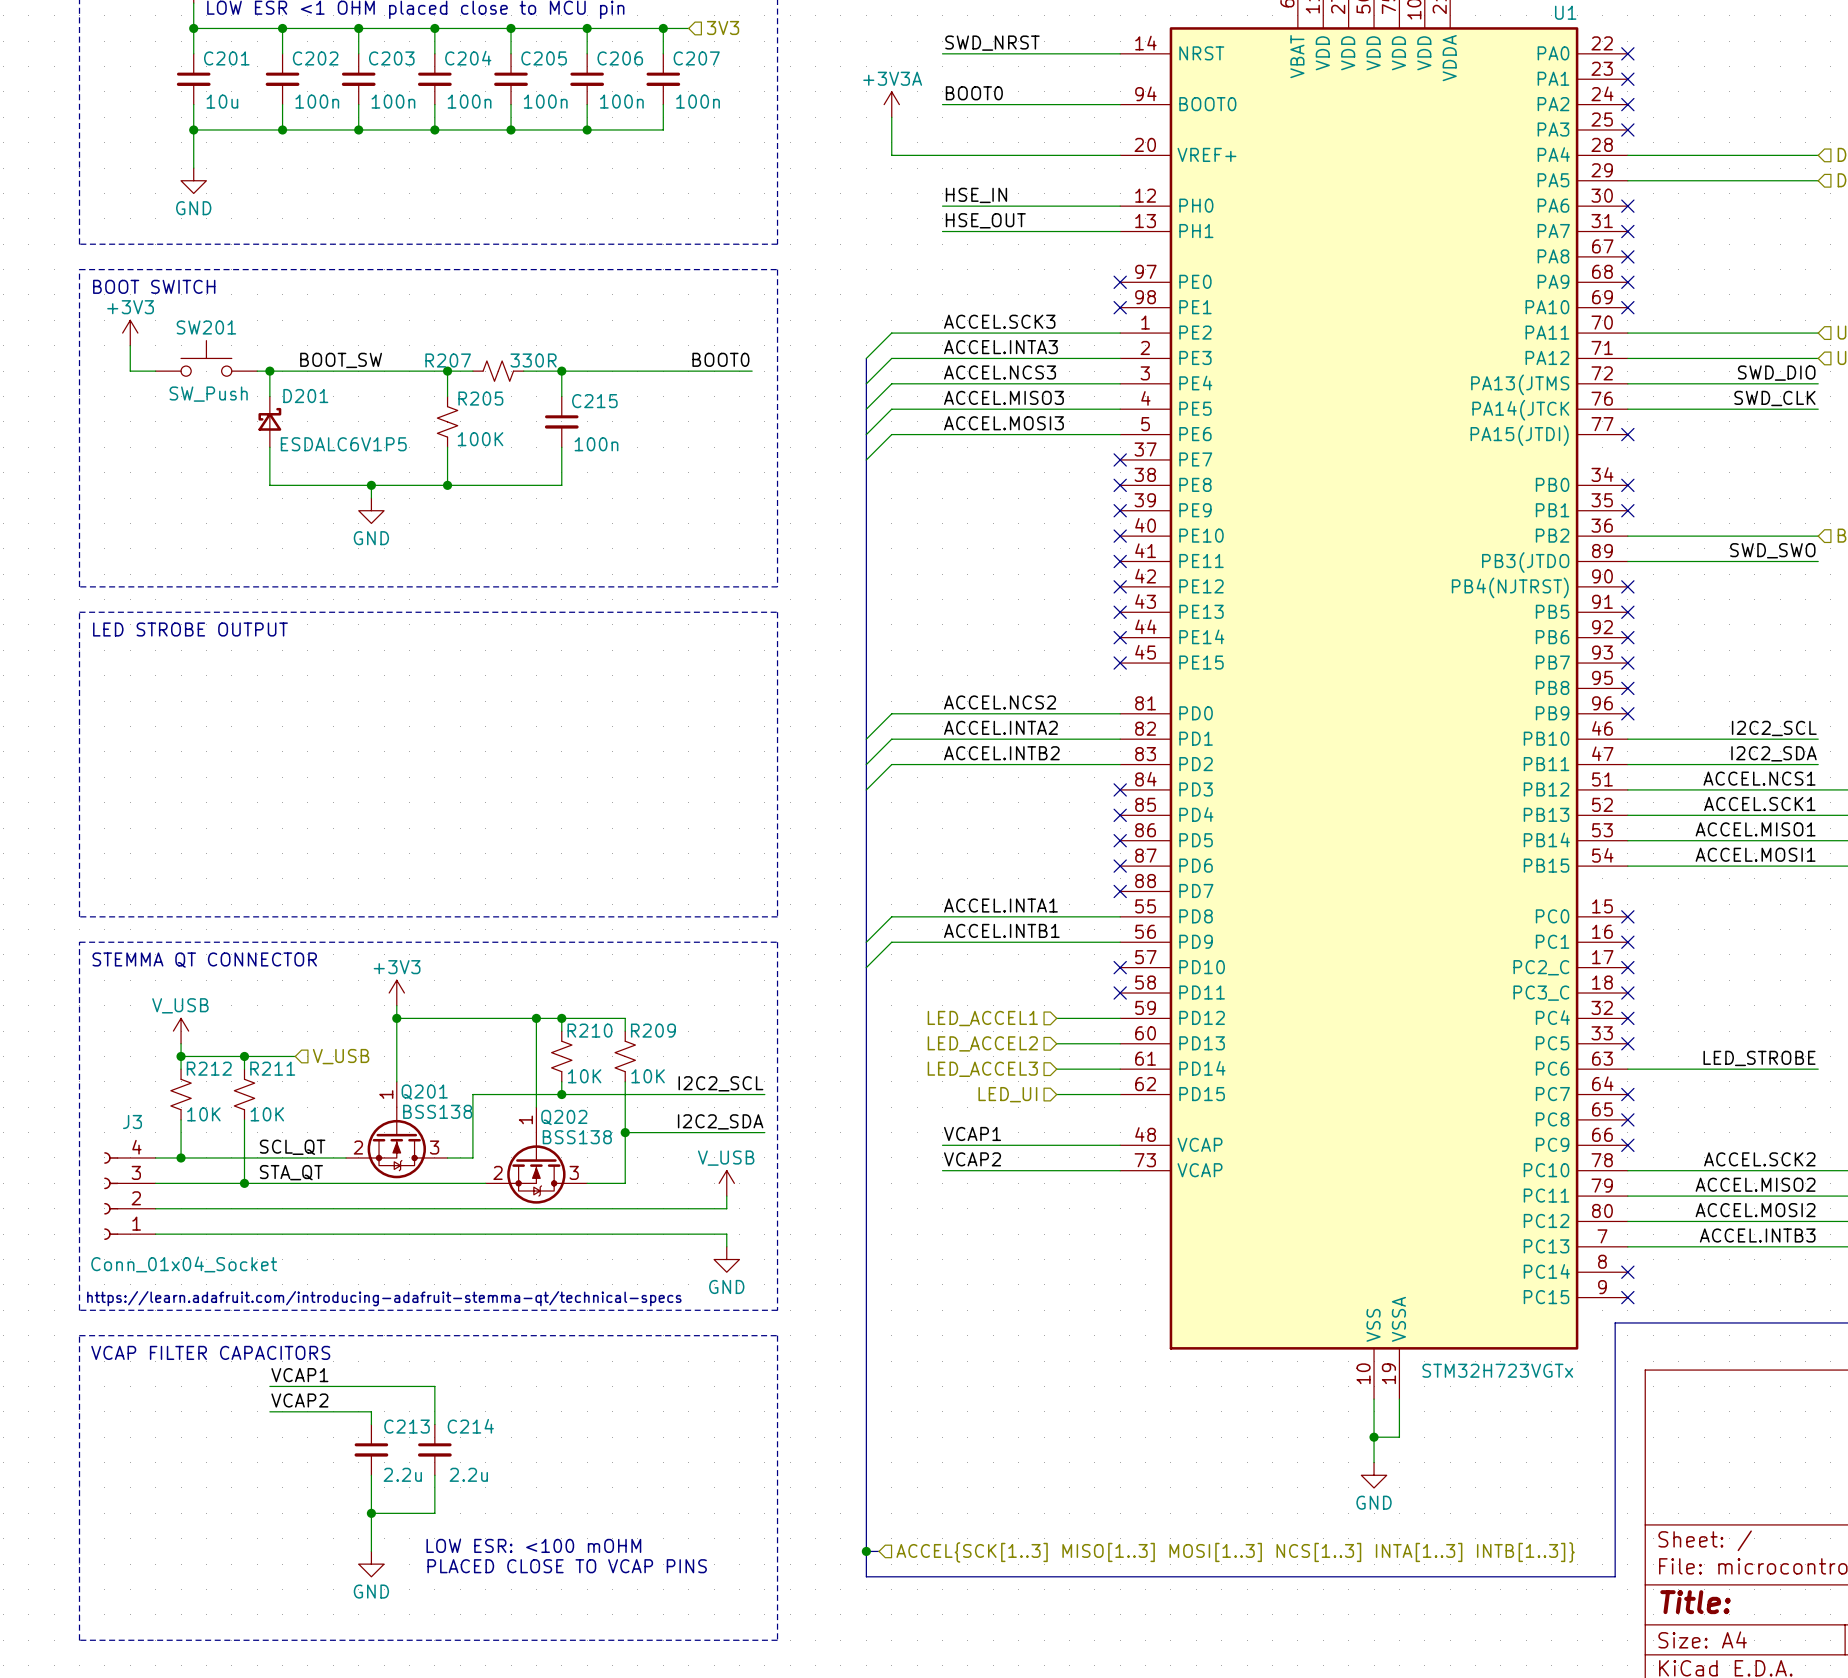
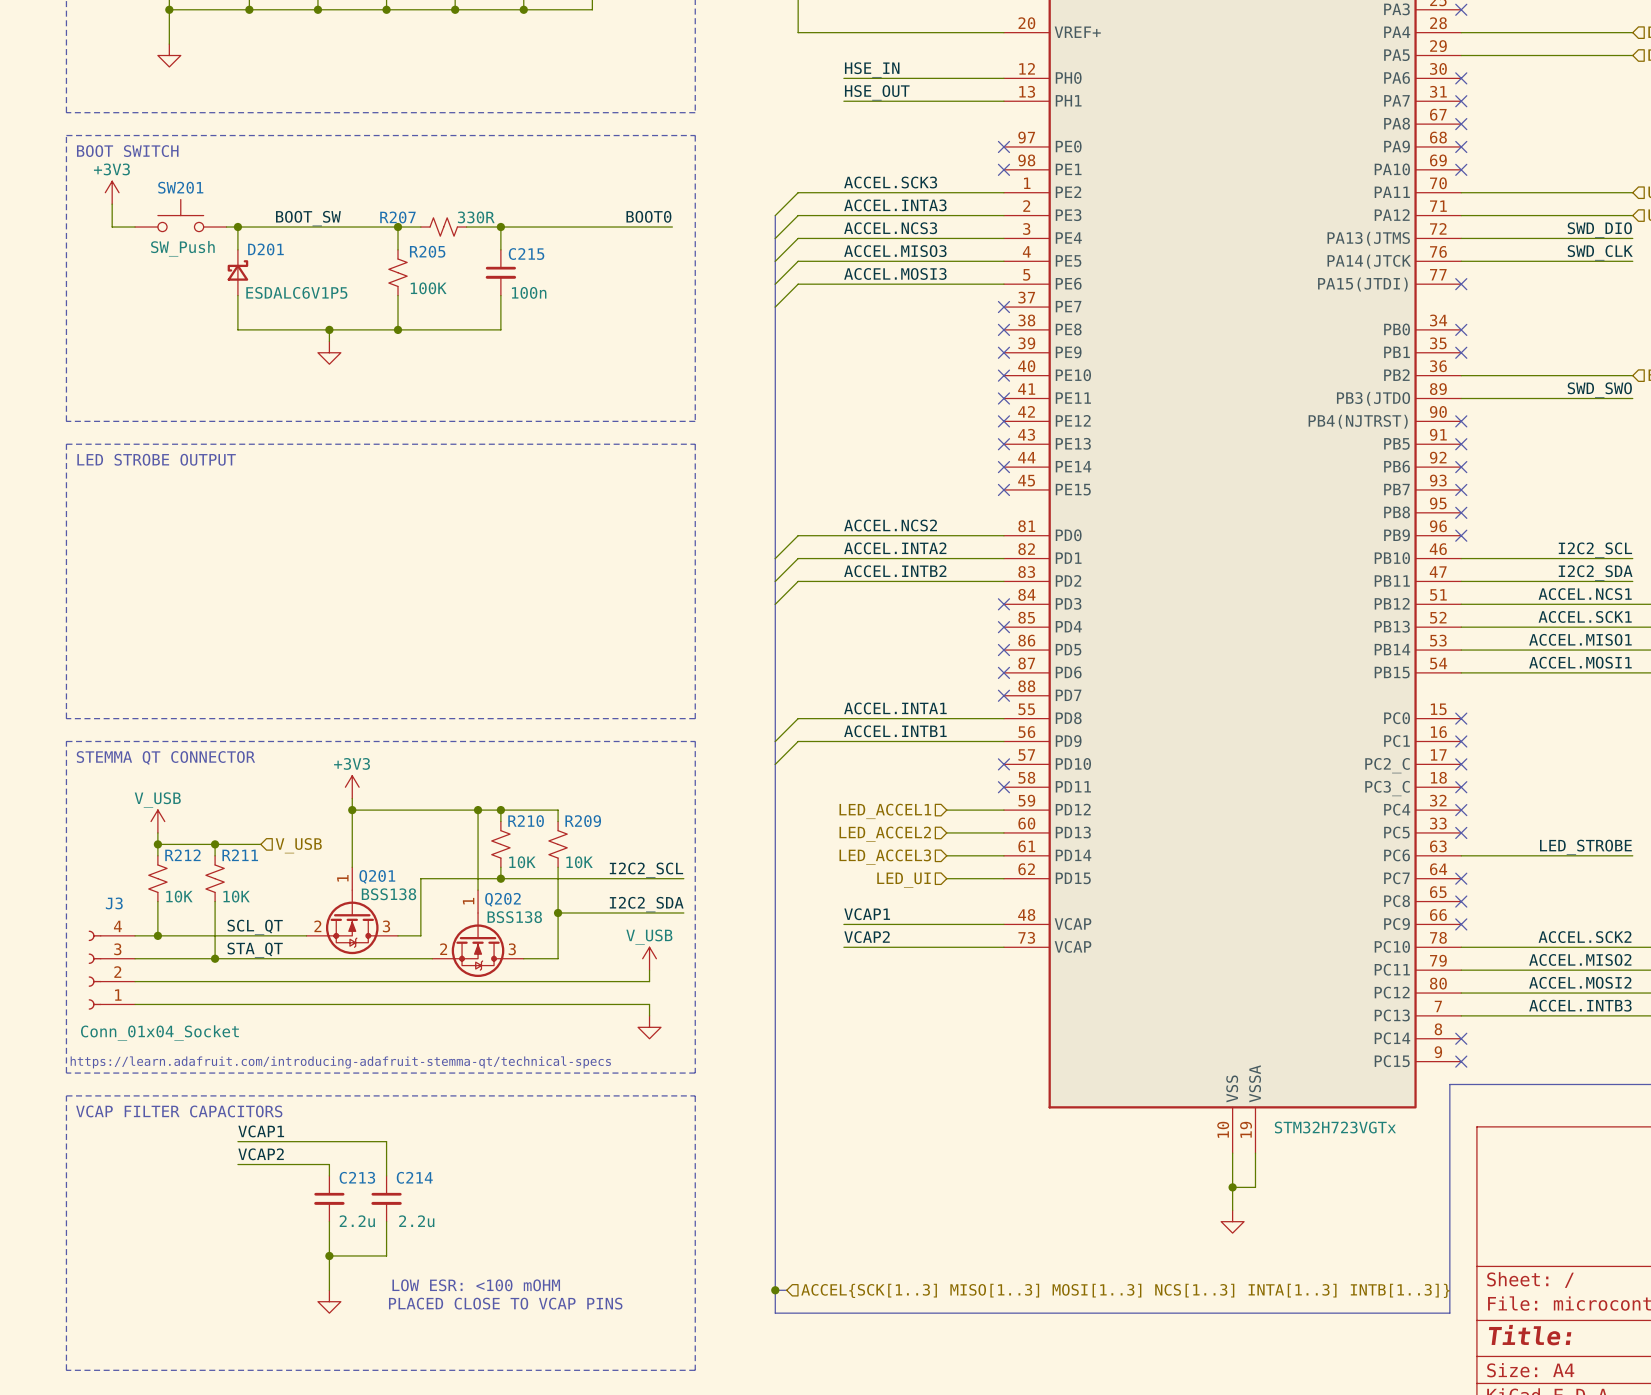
power symbol text: GND (193, 208) -> none
power symbol text: GND (371, 538) -> none
power symbol text: GND (726, 1286) -> none
power symbol text: GND (1374, 1502) -> none
power symbol text: GND (371, 1591) -> none

